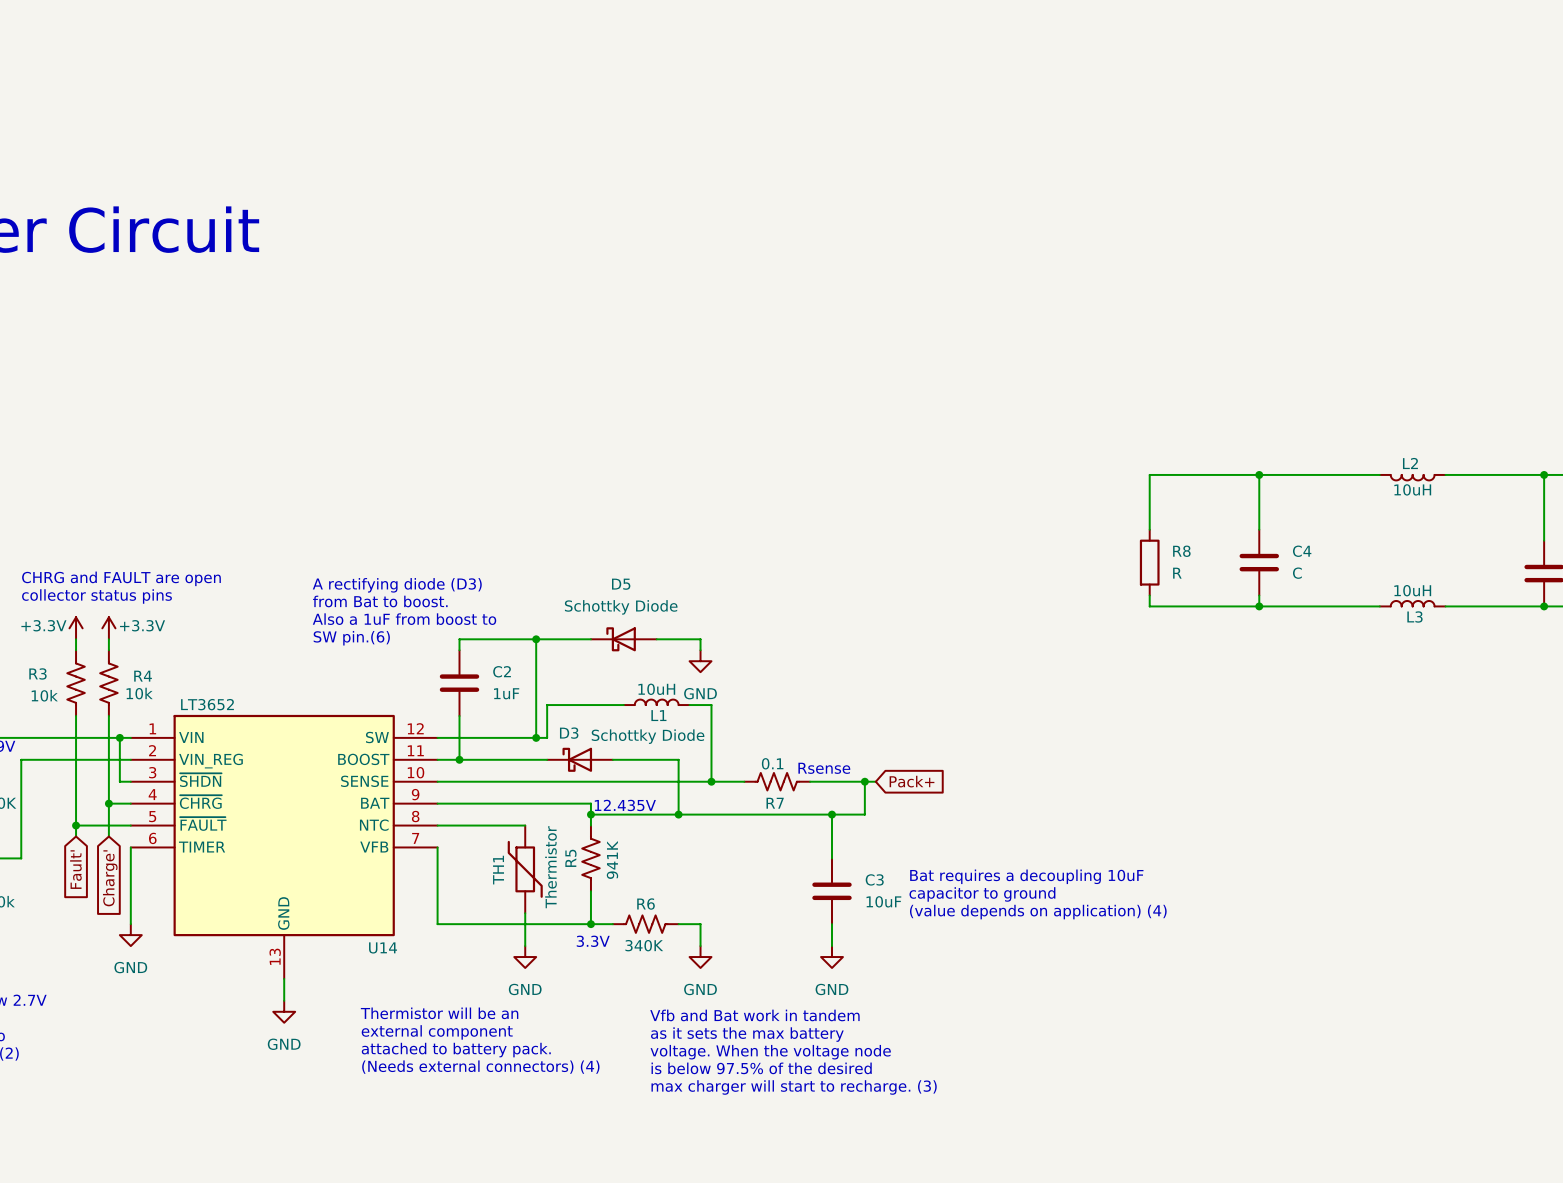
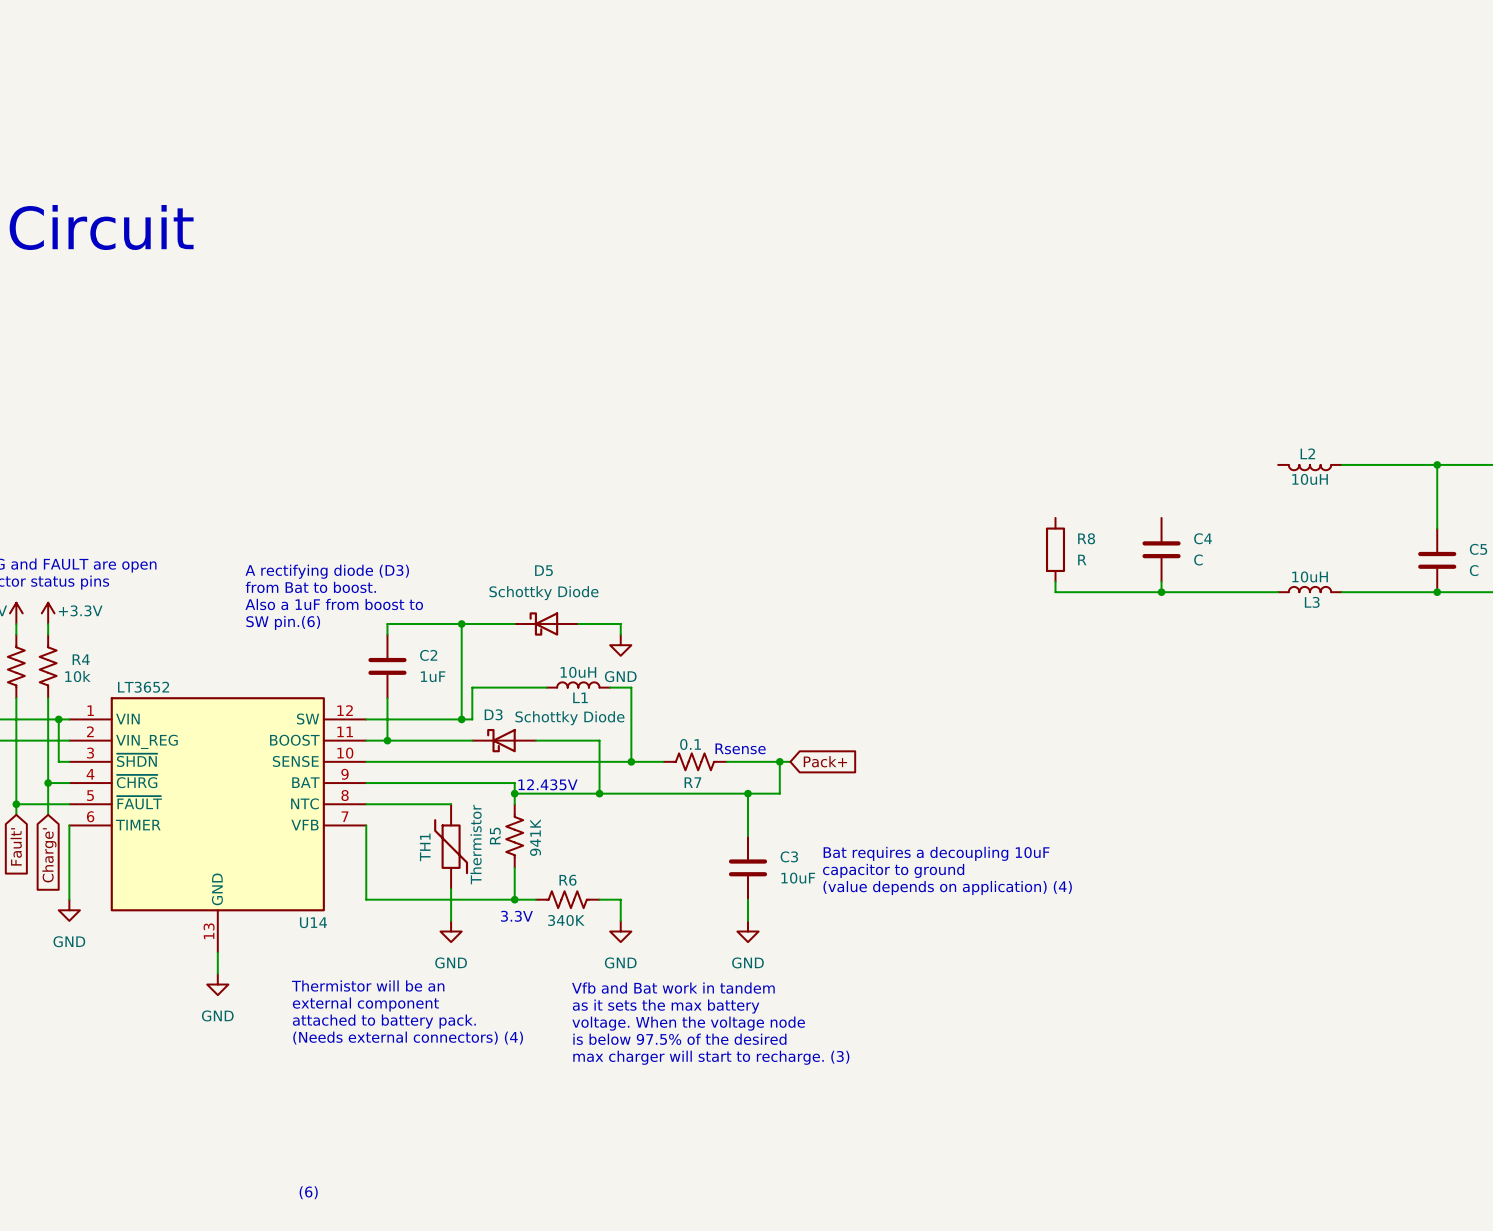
wire: (1259, 474) (1259, 529) -> none
junction: (1259, 474) -> none
wire: (1379, 474) (1149, 474) (1149, 529) -> none

